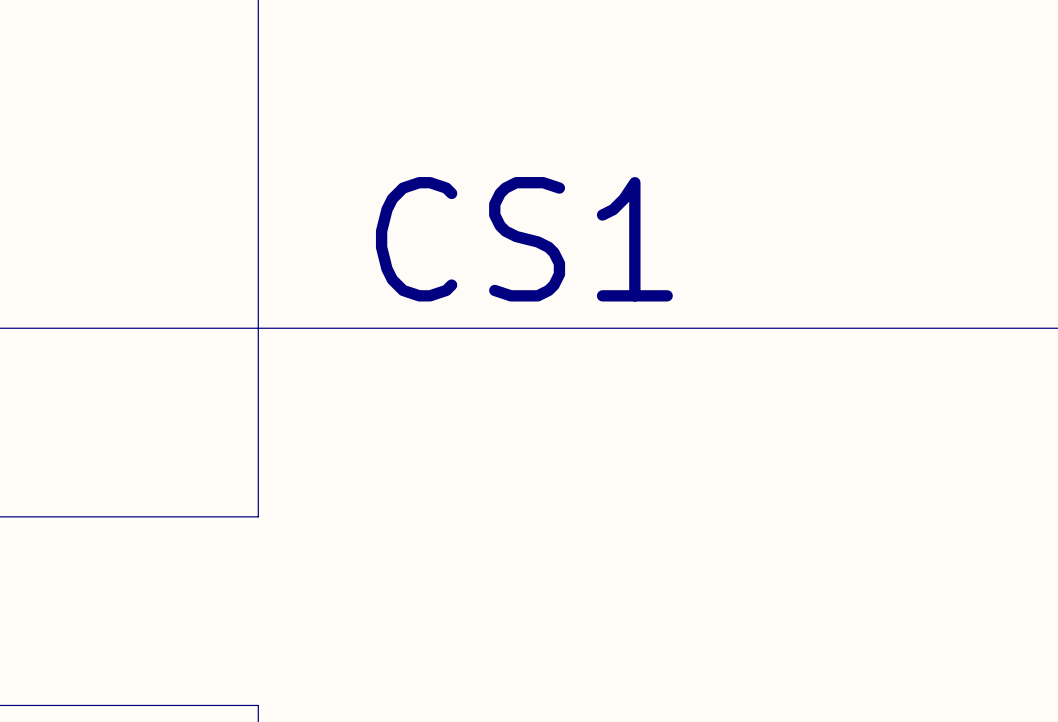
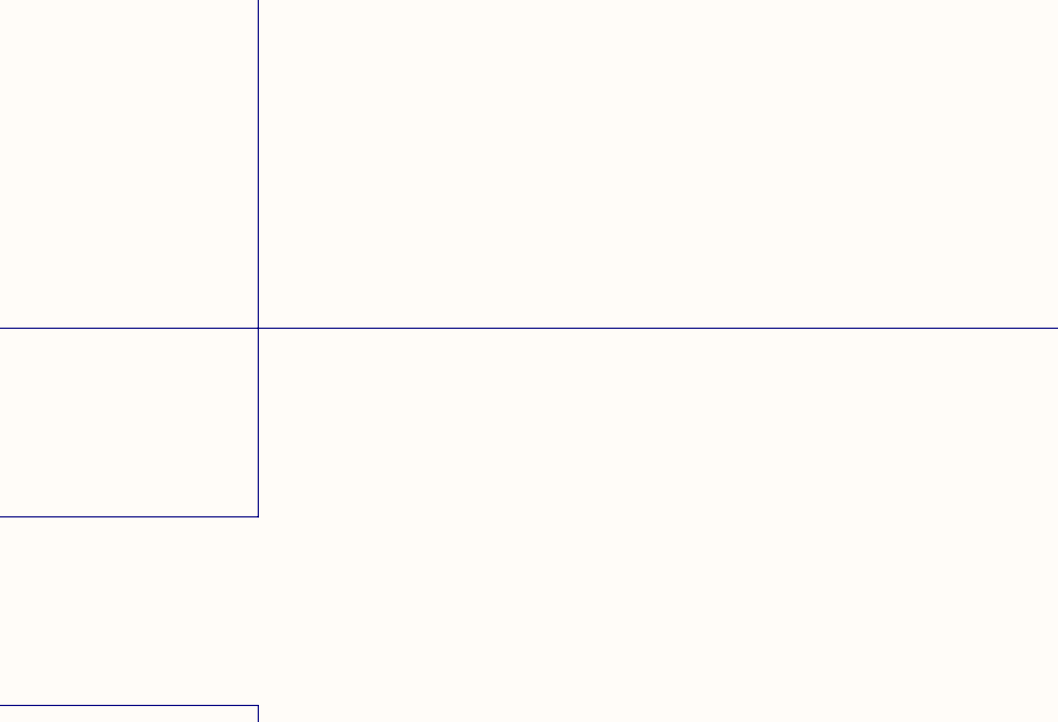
text: CS1 (524, 239) -> none

